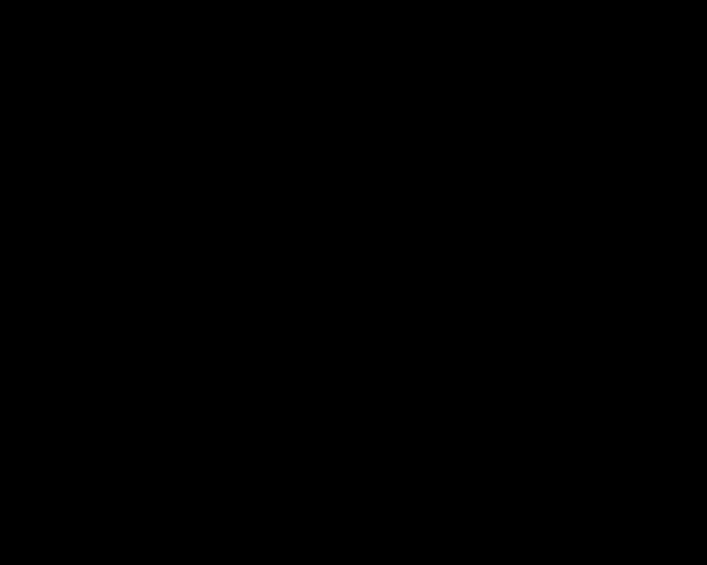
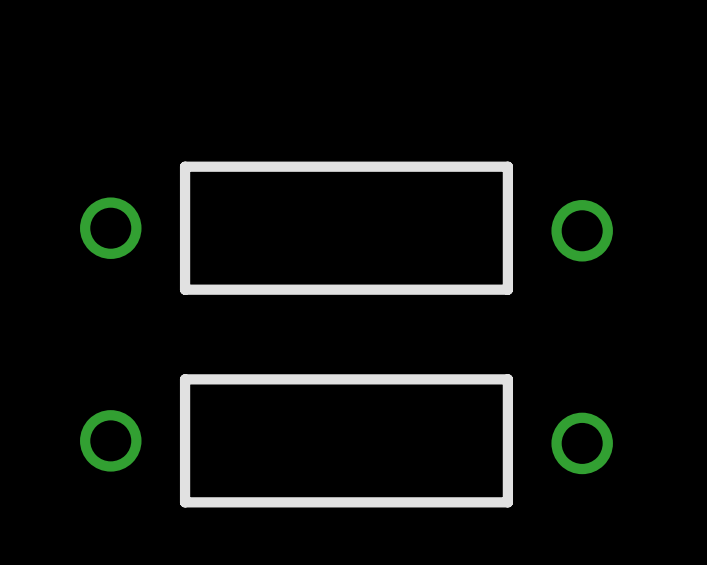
part: none -> (346, 228)
part: none -> (346, 440)

